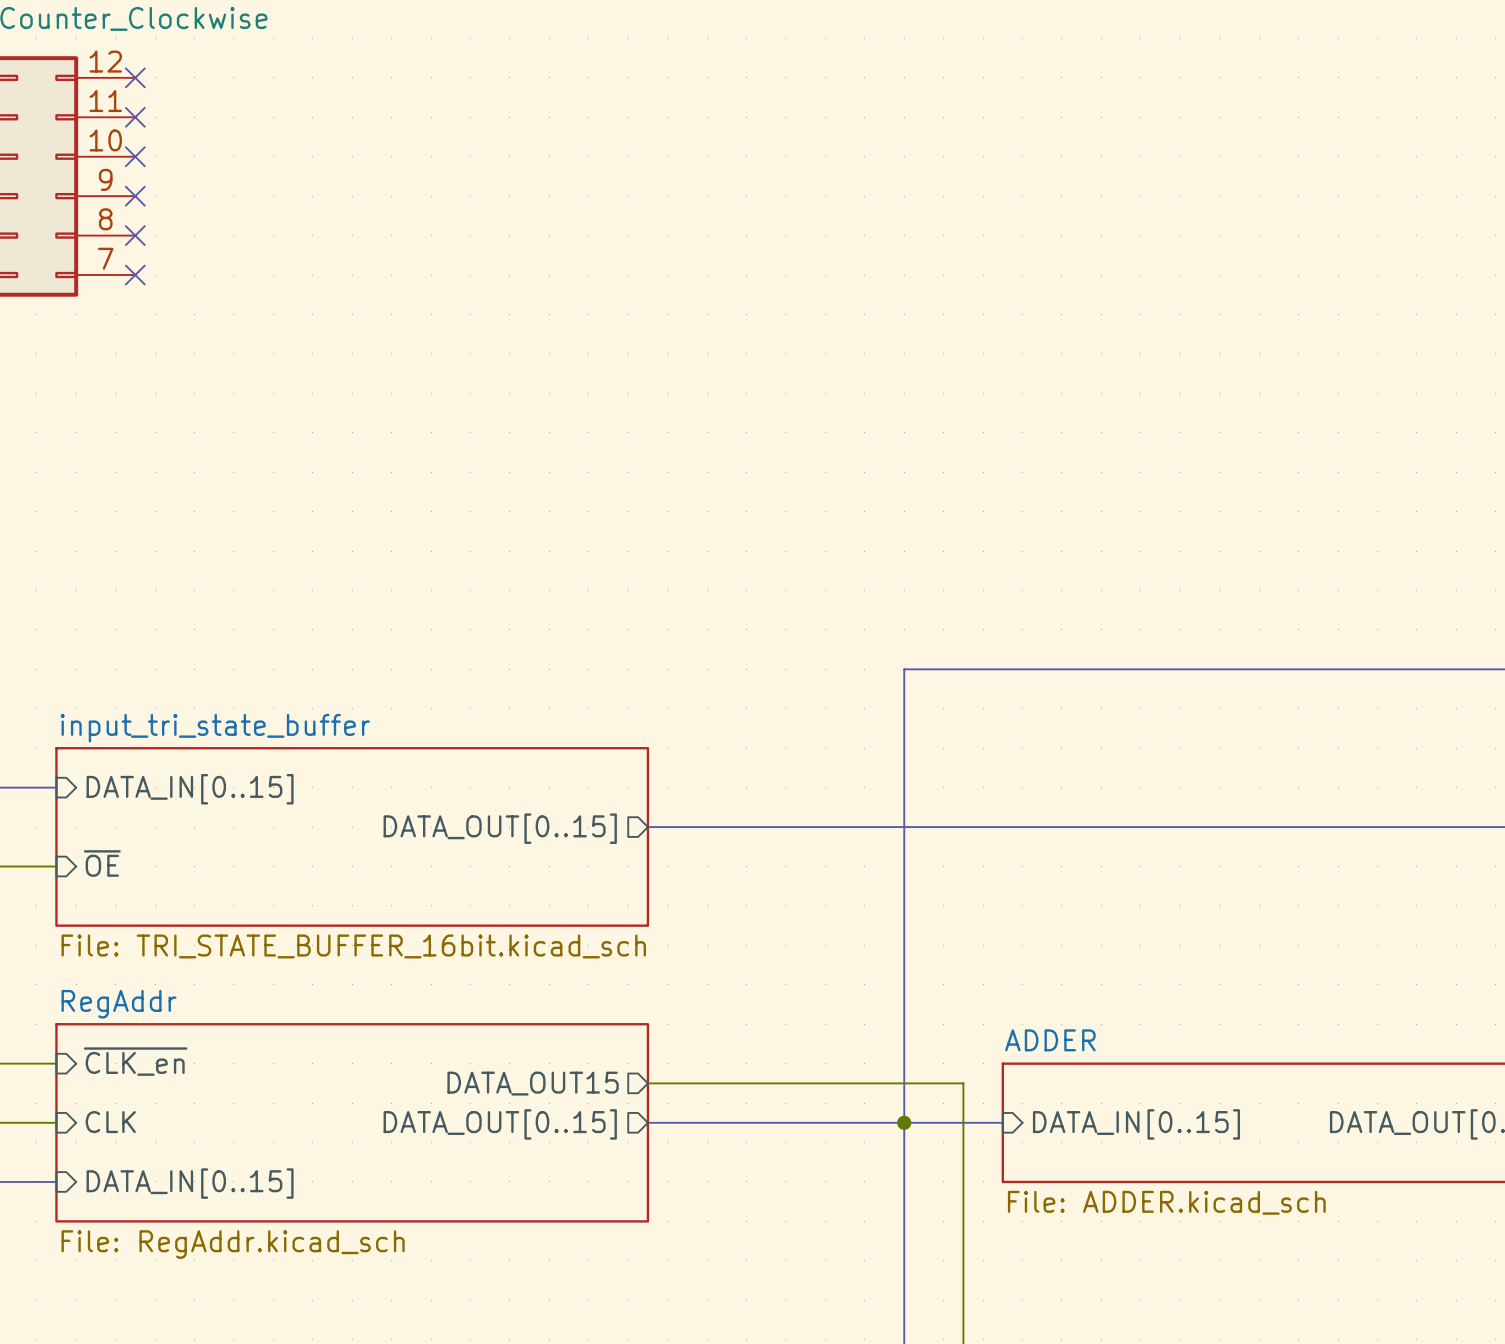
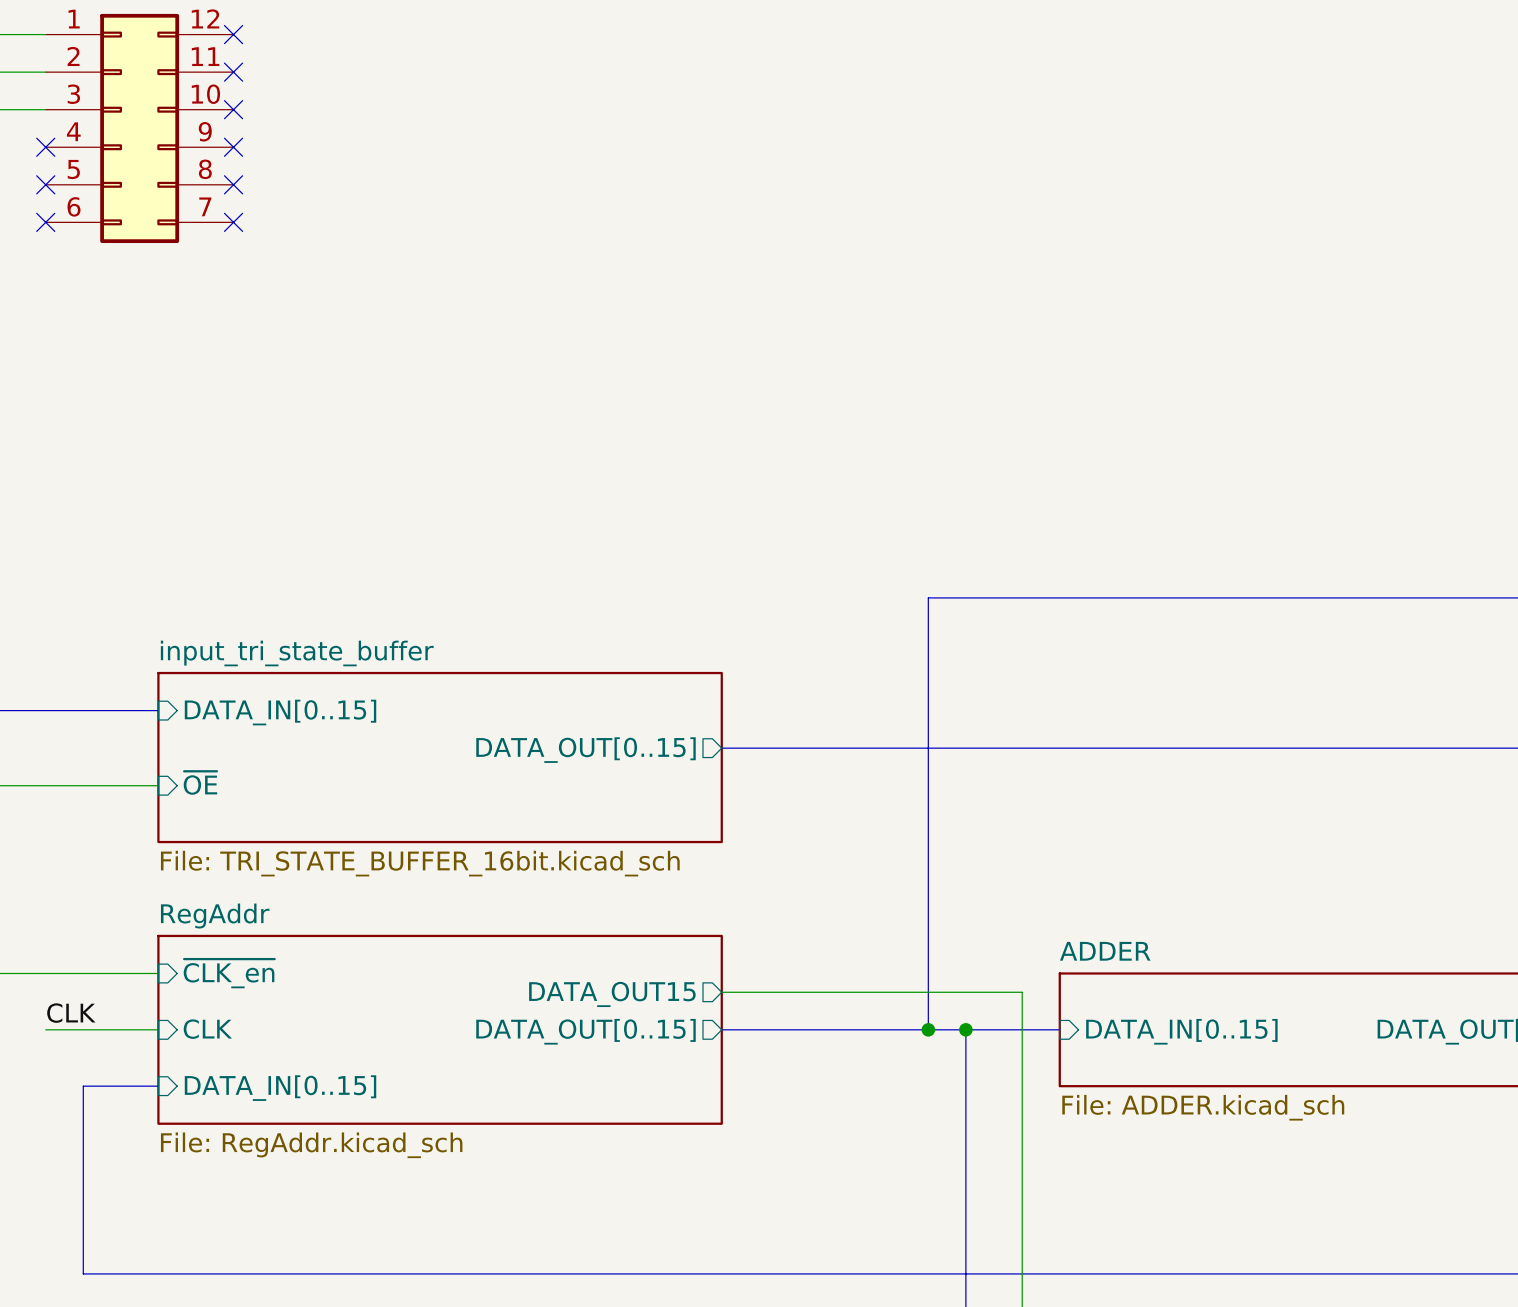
bus: (904, 669) (904, 1122) -> (965, 597) (928, 597) (928, 1029)
junction: none -> (928, 1029)

